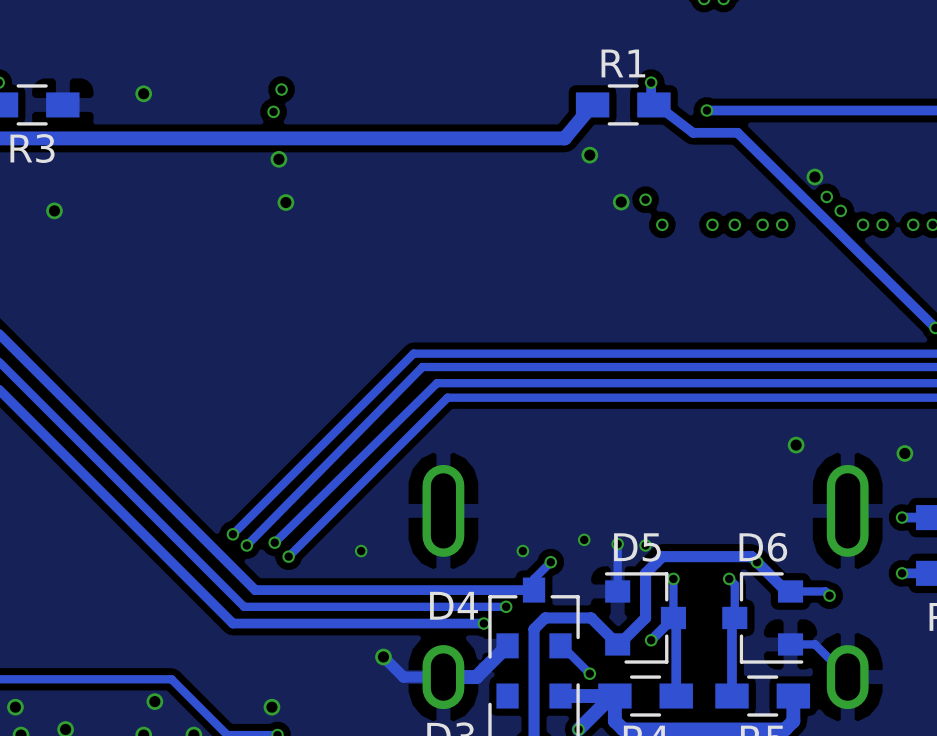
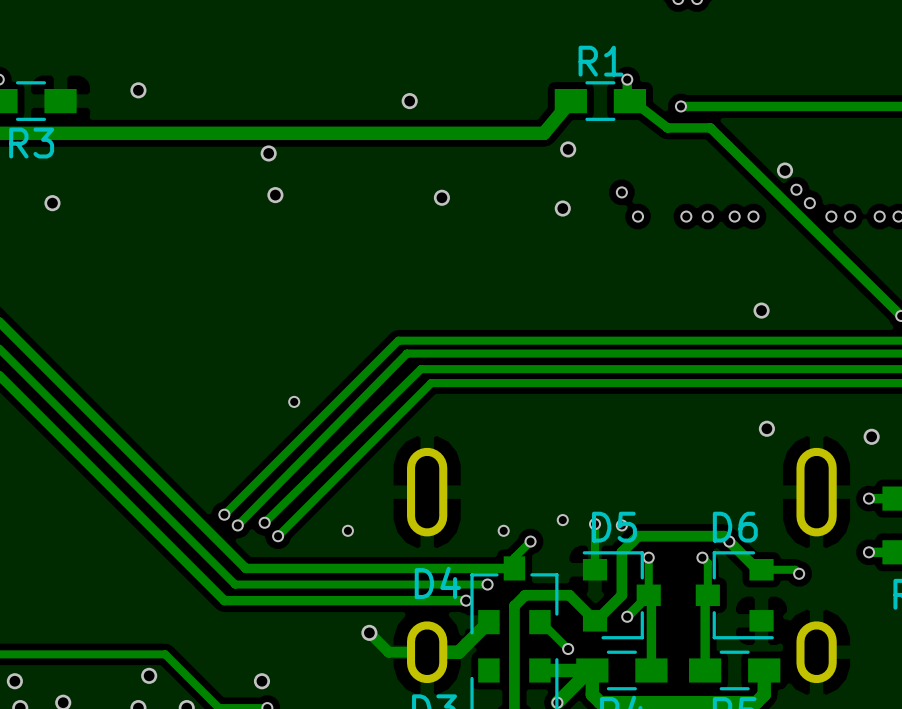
via: (281, 89) -> none
via: none -> (409, 101)
via: (273, 111) -> none
via position: (621, 202) -> (562, 208)
via: none -> (441, 197)
via: none -> (761, 310)
via: none -> (294, 401)
track: (790, 644) (815, 644) (847, 677) -> none

